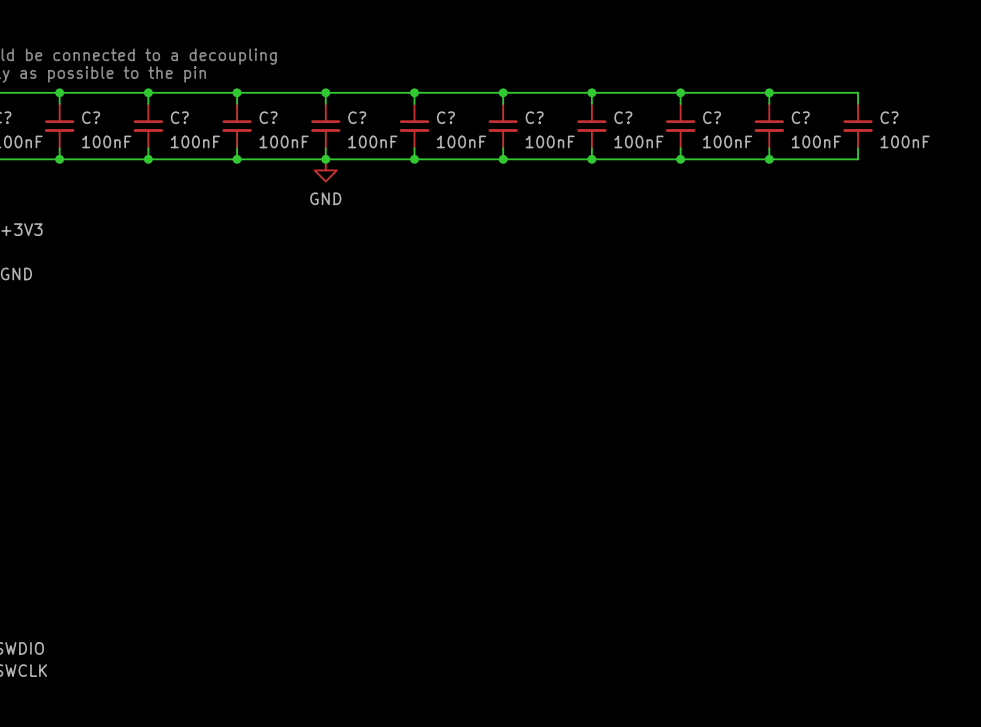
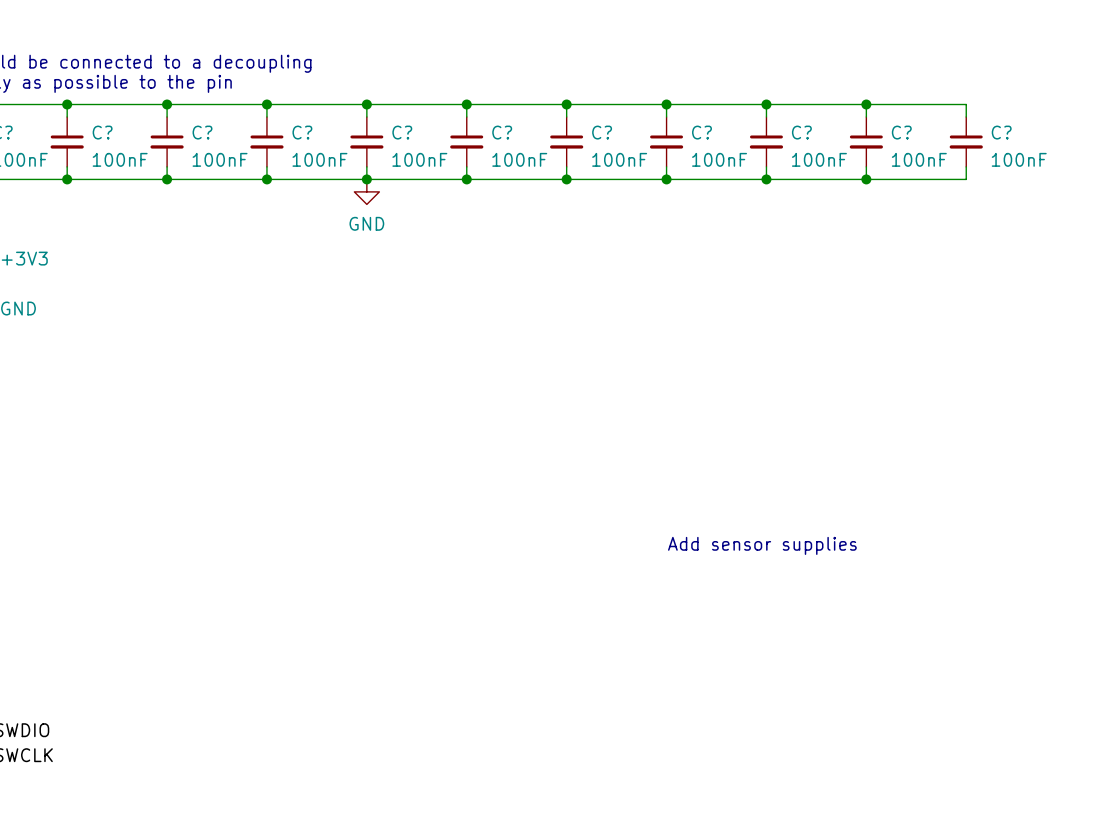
text: none -> Add sensor supplies (762, 545)

